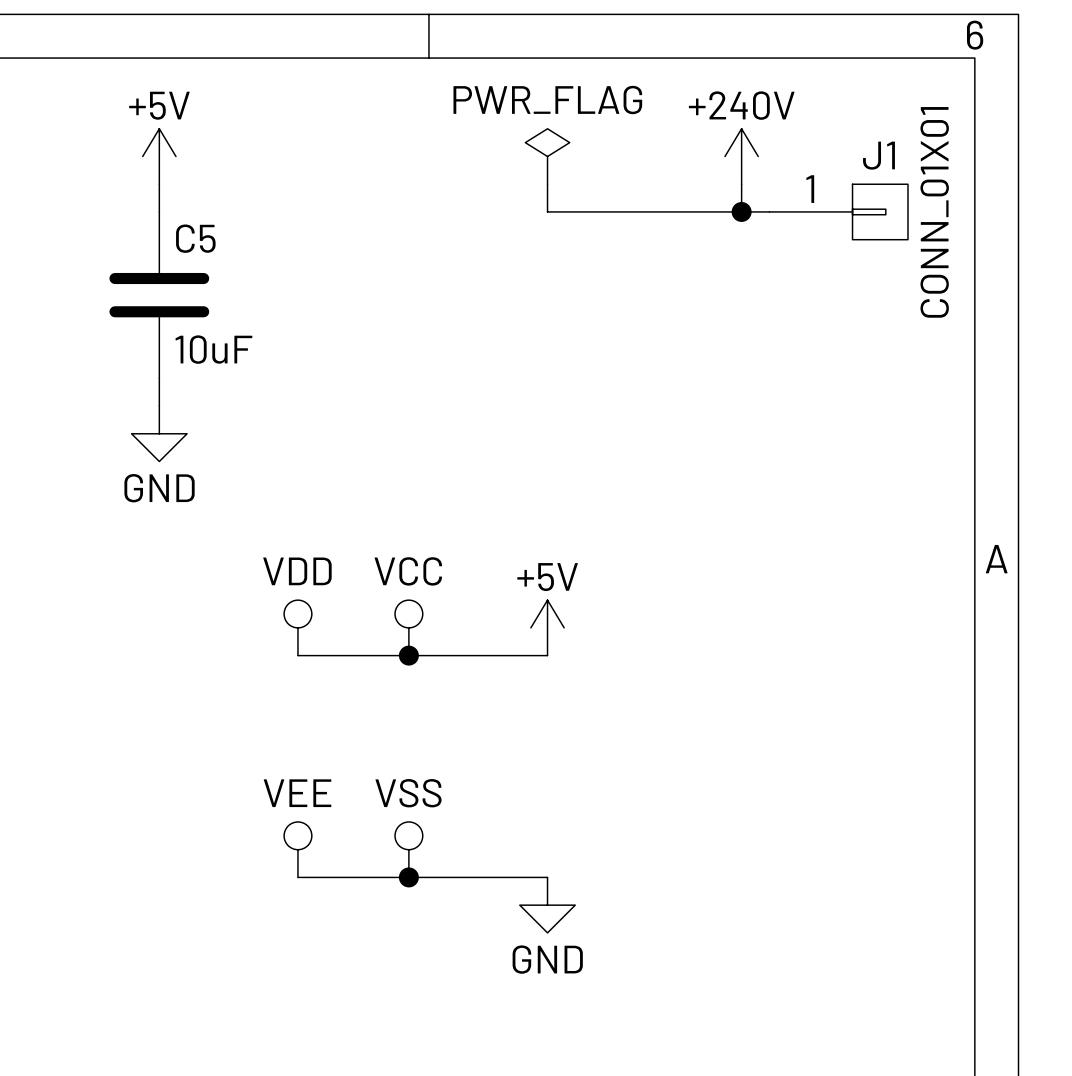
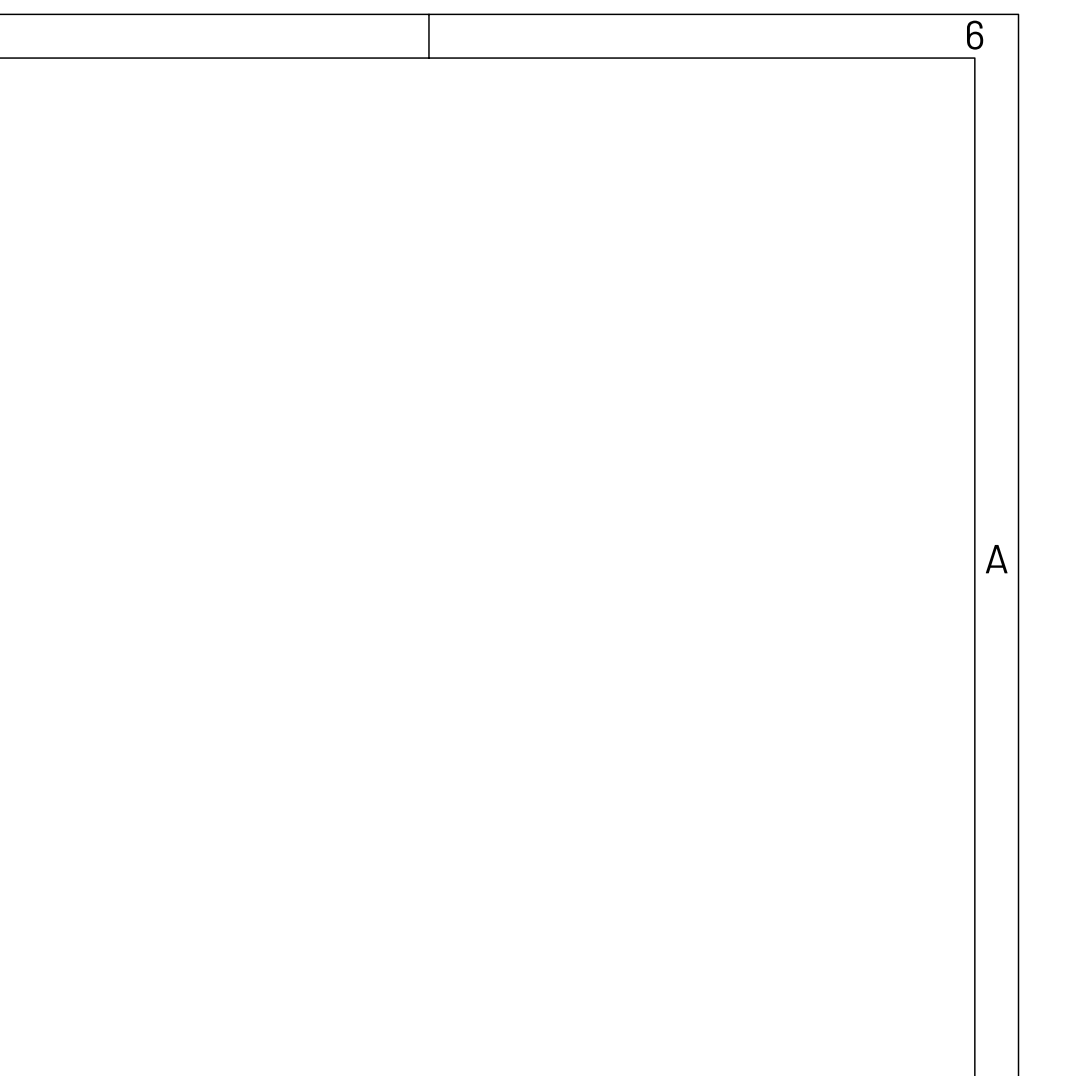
power symbol: +5V (159, 156) -> none
power symbol: PWR_FLAG (547, 156) -> none
power symbol: +240V (741, 156) -> none
wire: (159, 184) (159, 211) -> none
wire: (547, 184) (547, 211) (769, 211) -> none
wire: (741, 184) (741, 211) -> none
junction: (741, 211) -> none
J1: CONN_01X01 (838, 211) -> none
C5: 10uF (159, 295) -> none
wire: (159, 378) (159, 406) -> none
power symbol: GND (159, 433) -> none
power symbol: VDD (297, 627) -> none
power symbol: VCC (408, 627) -> none
power symbol: +5V (547, 627) -> none
wire: (297, 655) (547, 655) -> none
junction: (408, 655) -> none
power symbol: VEE (297, 849) -> none
power symbol: VSS (408, 849) -> none
wire: (297, 877) (547, 877) -> none
junction: (408, 877) -> none
power symbol: GND (547, 905) -> none

